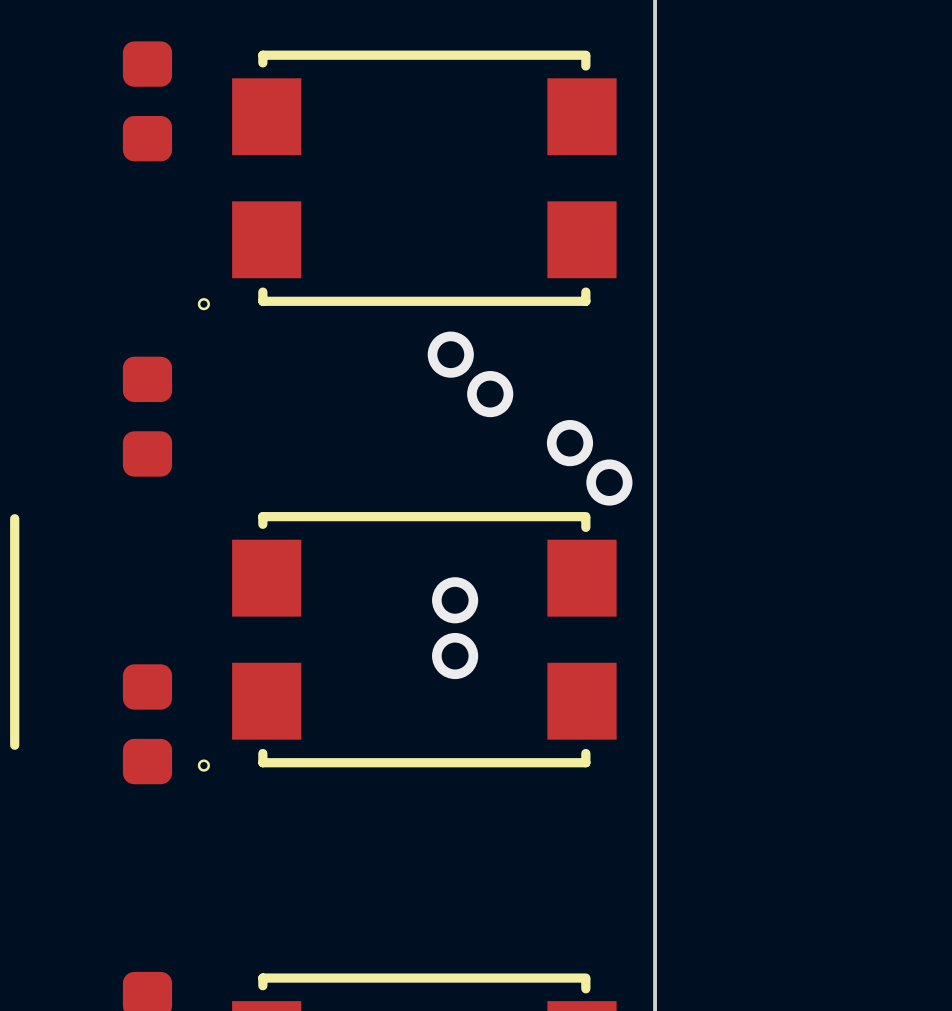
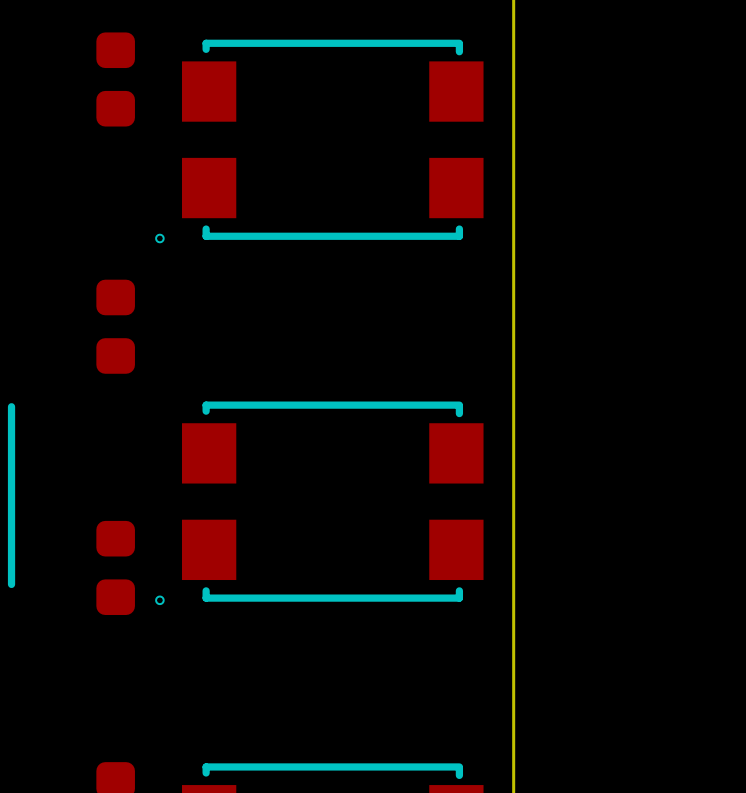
via: (450, 354) -> none
via: (490, 394) -> none
via: (569, 443) -> none
via: (609, 482) -> none
via: (455, 600) -> none
via: (455, 656) -> none

